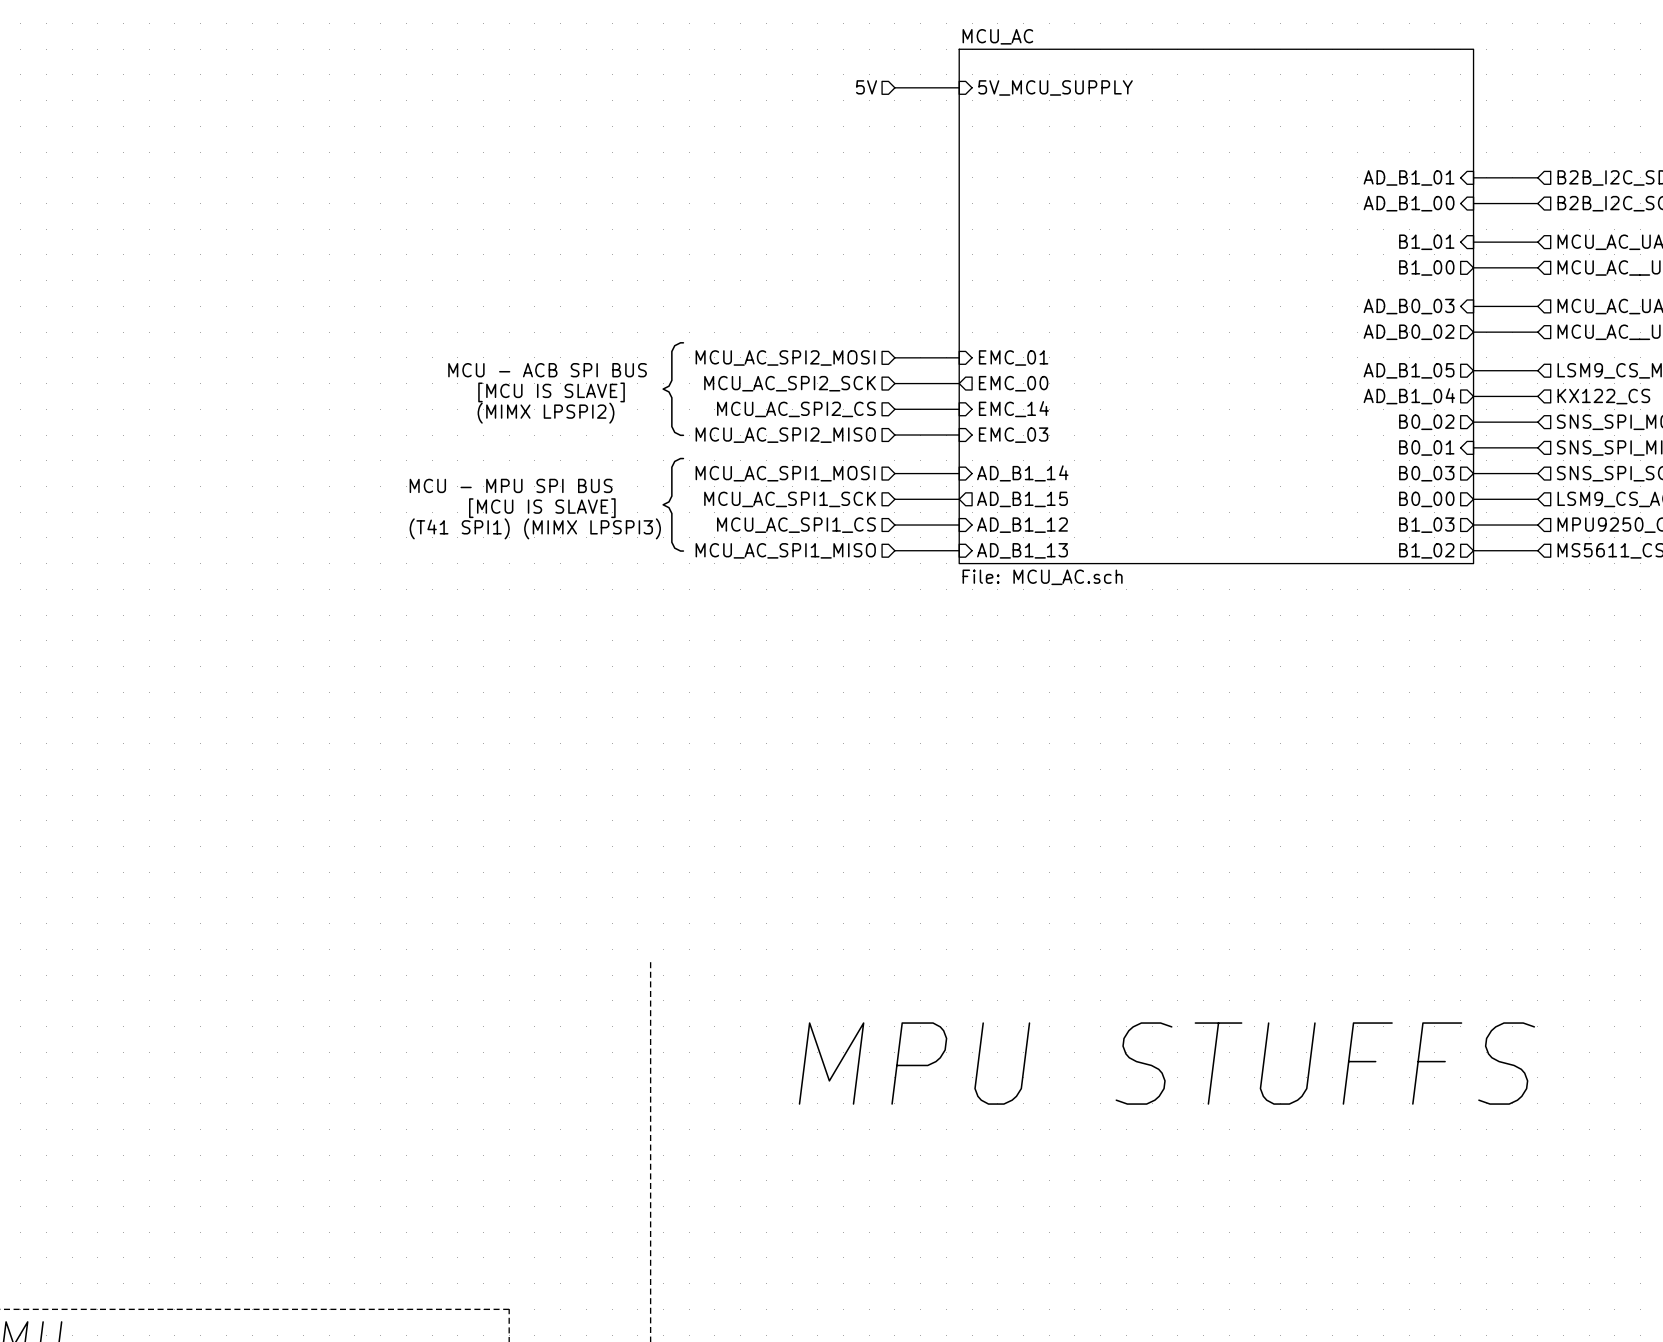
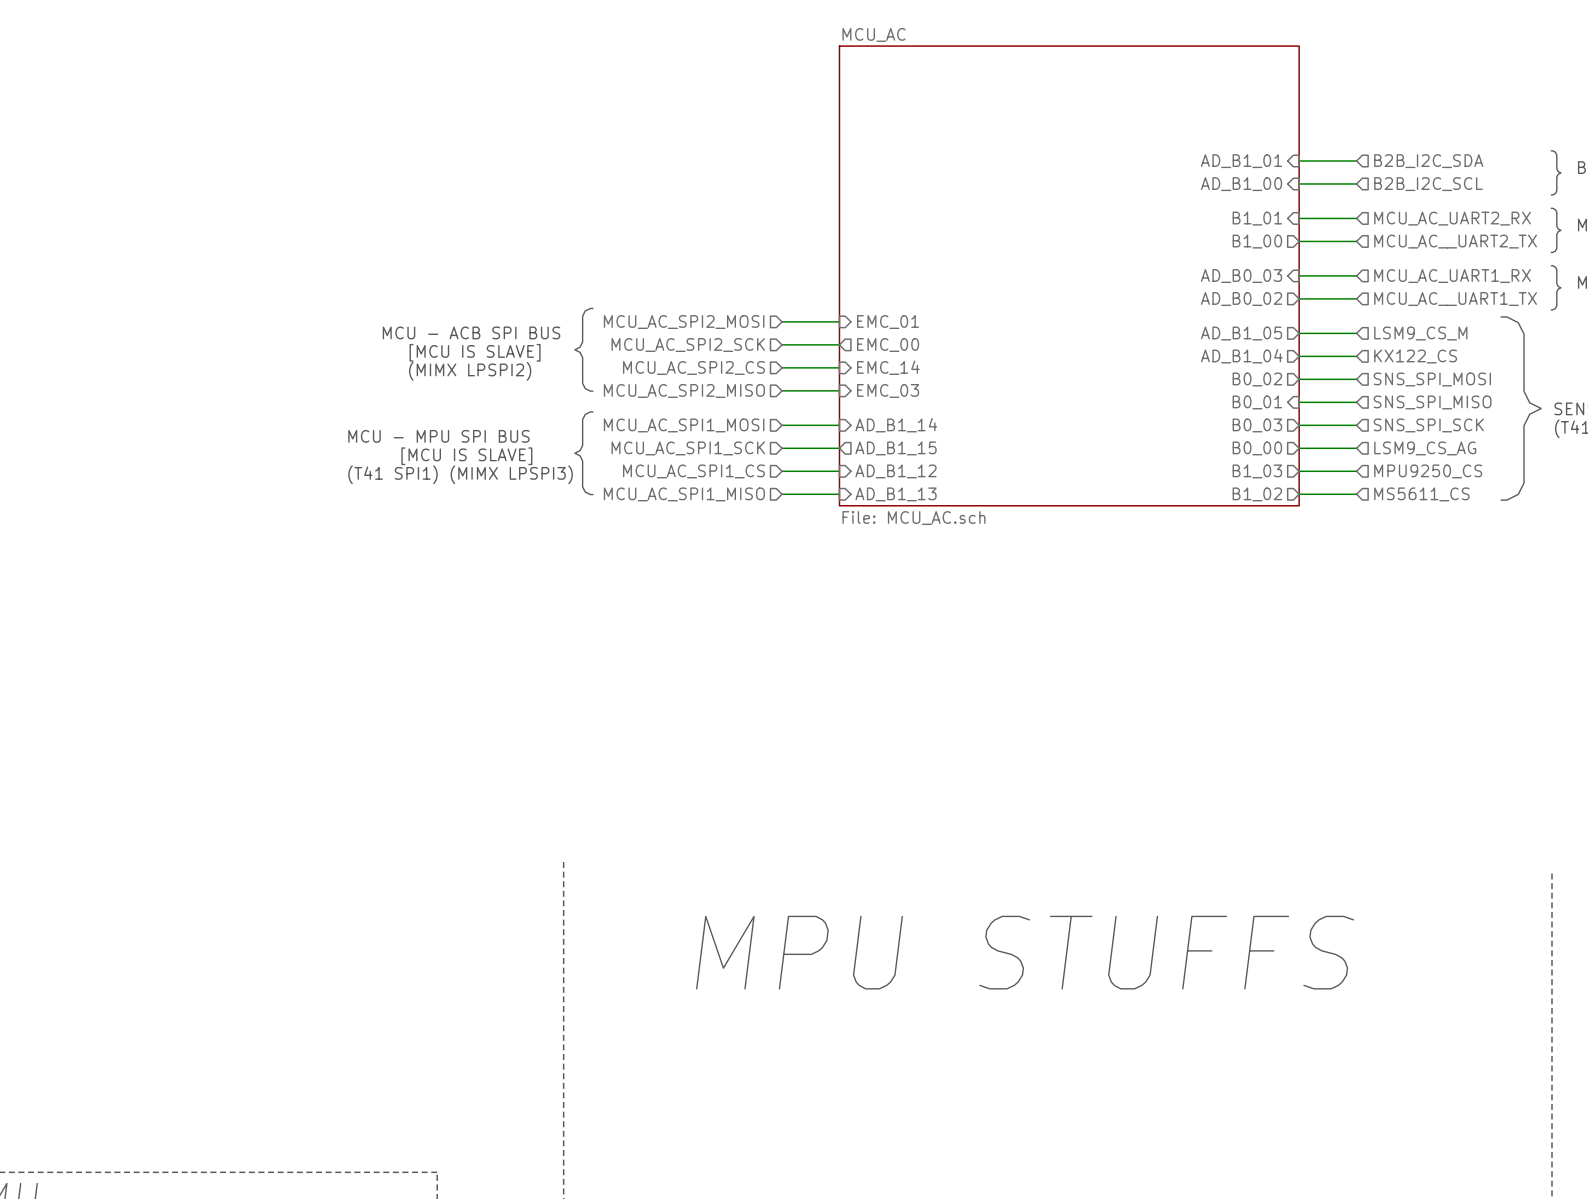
hierarchical label: 5V (866, 87) -> none
wire: (894, 87) (959, 87) -> none
sheet pin: 5V_MCU_SUPPLY (1055, 87) -> none

